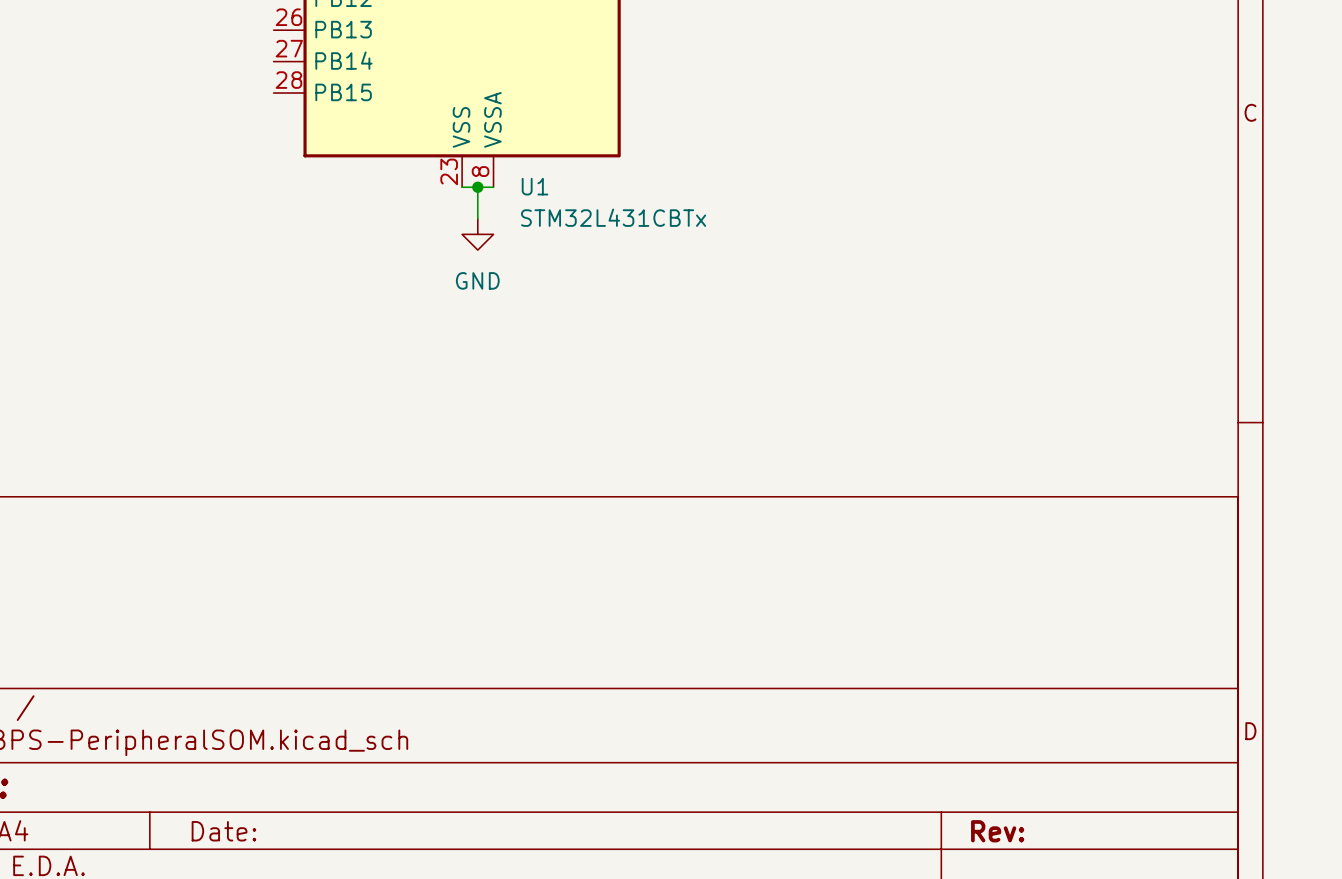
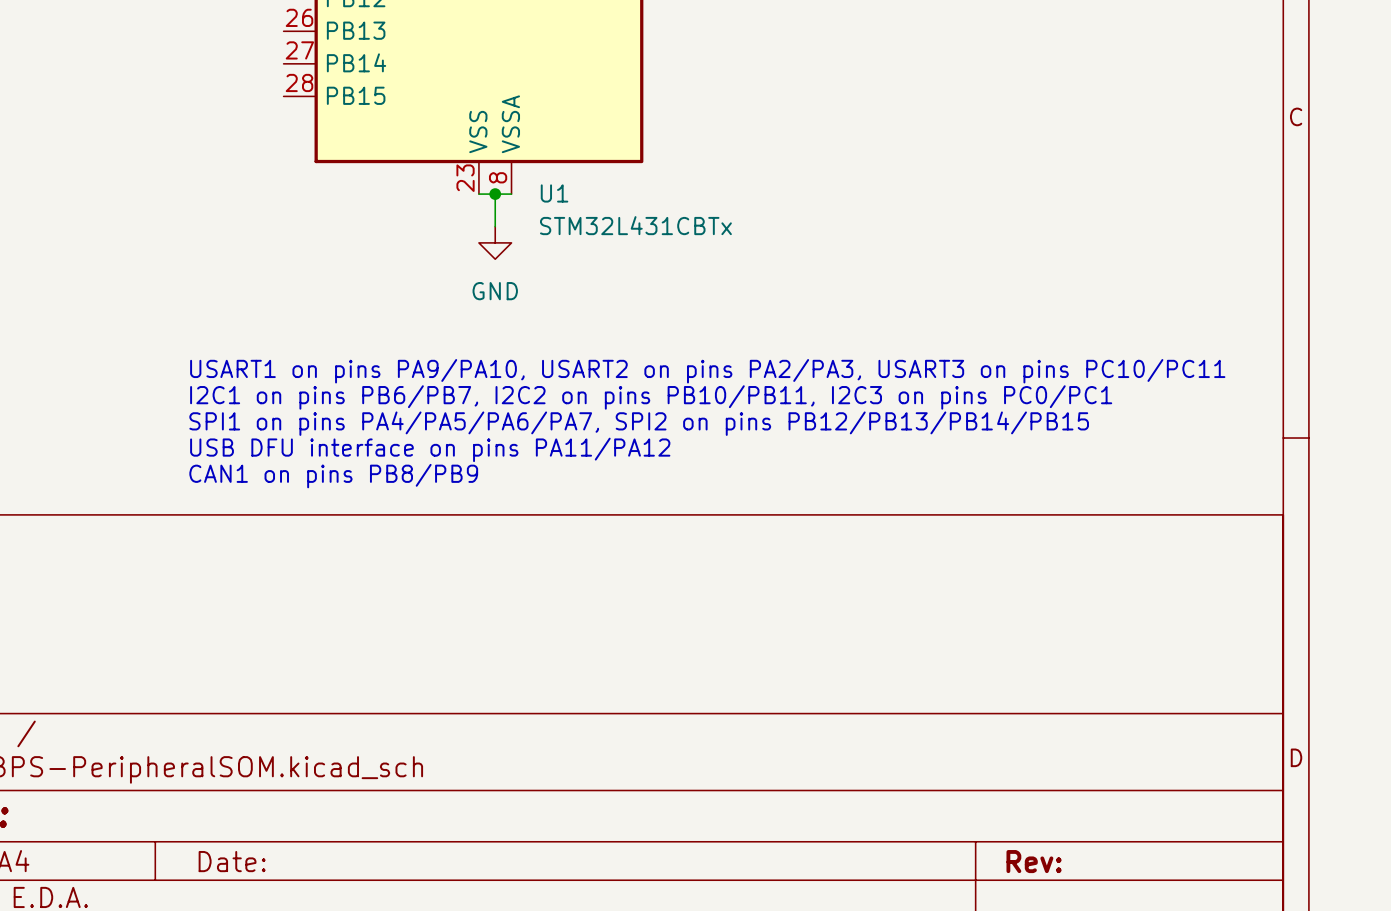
text: none -> USART1 on pins PA9/PA10, USART2 on pins PA2/PA3, USART3 on pins PC10/PC11 (707, 371)
text: none -> I2C1 on pins PB6/PB7, I2C2 on pins PB10/PB11, I2C3 on pins PC0/PC1 (651, 397)
text: none -> SPI1 on pins PA4/PA5/PA6/PA7, SPI2 on pins PB12/PB13/PB14/PB15 (639, 423)
text: none -> USB DFU interface on pins PA11/PA12 (430, 449)
text: none -> CAN1 on pins PB8/PB9 (333, 476)

